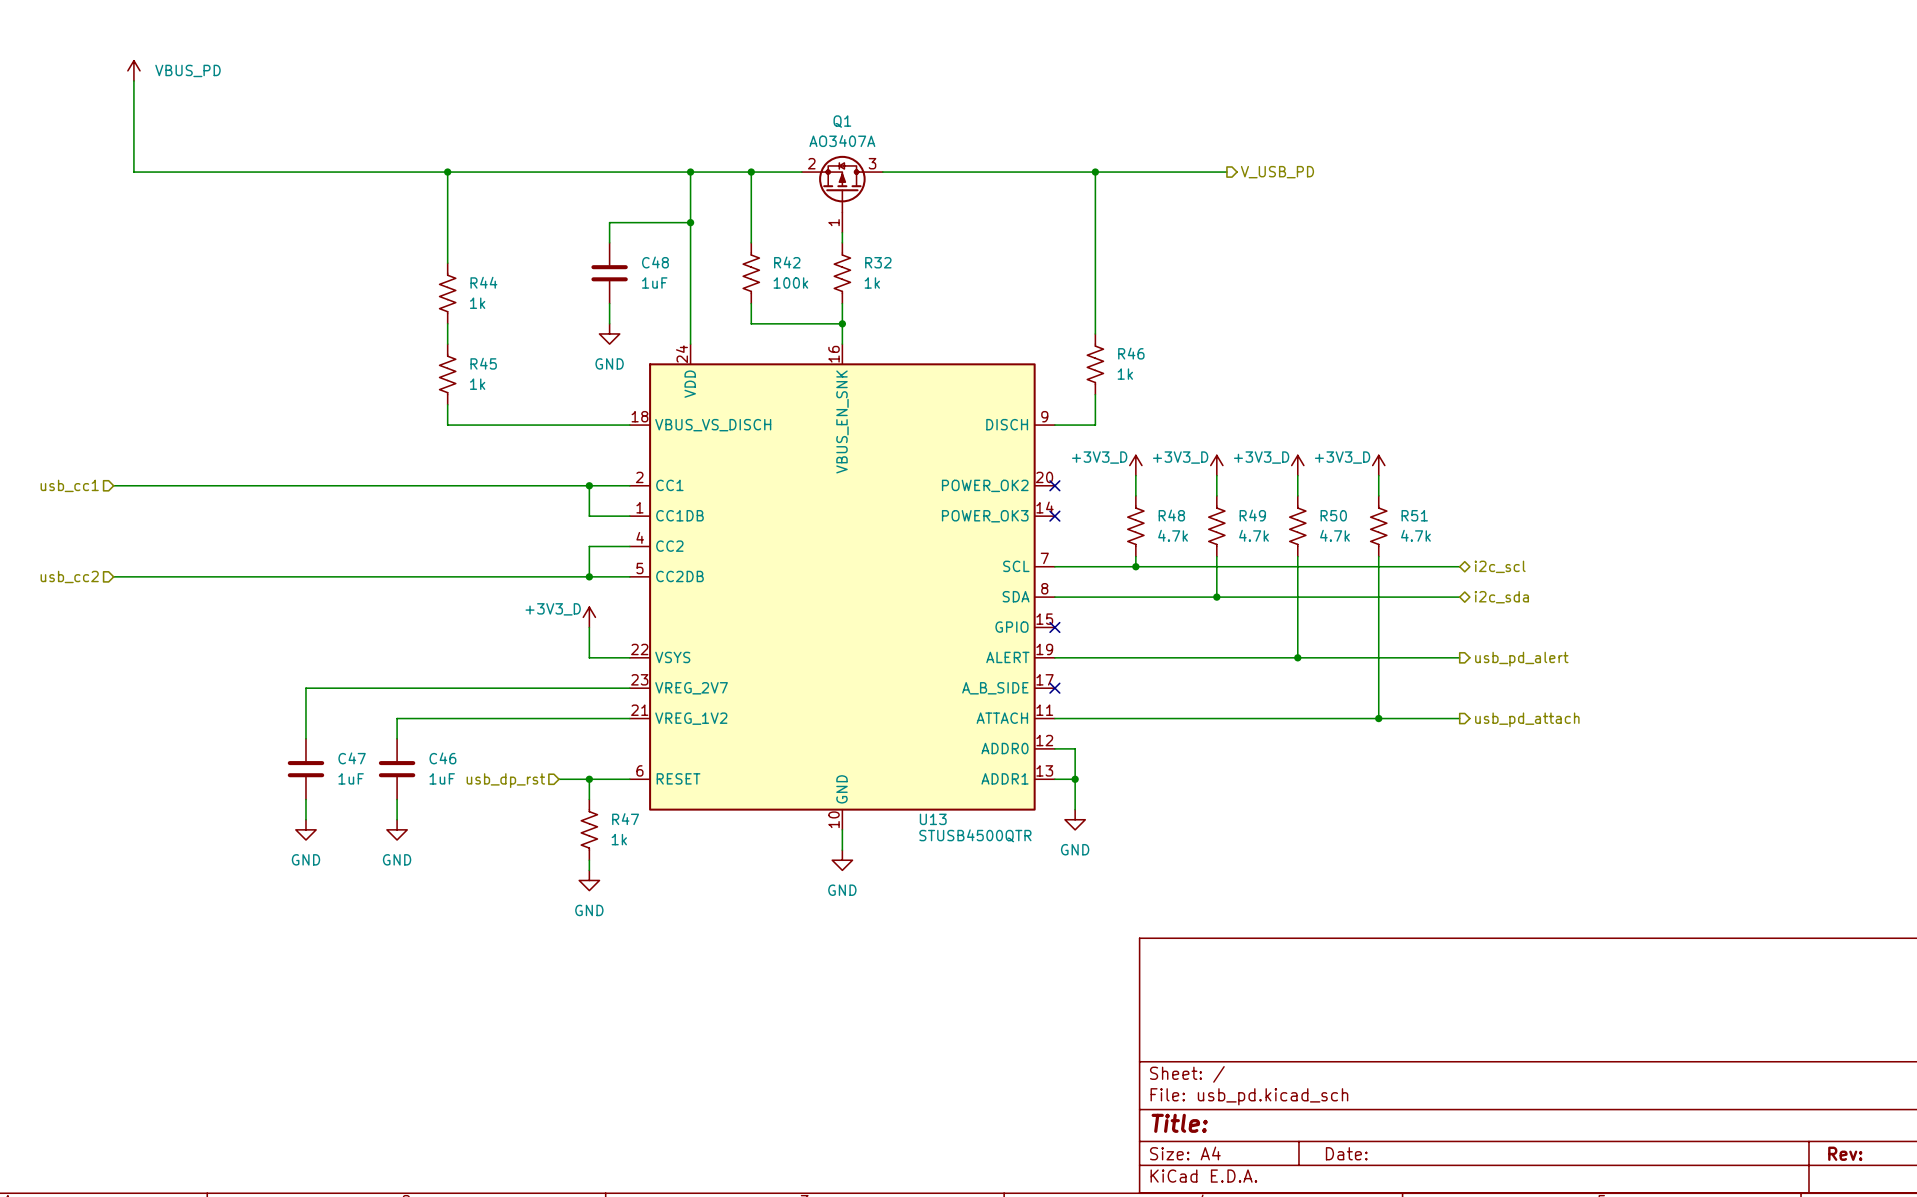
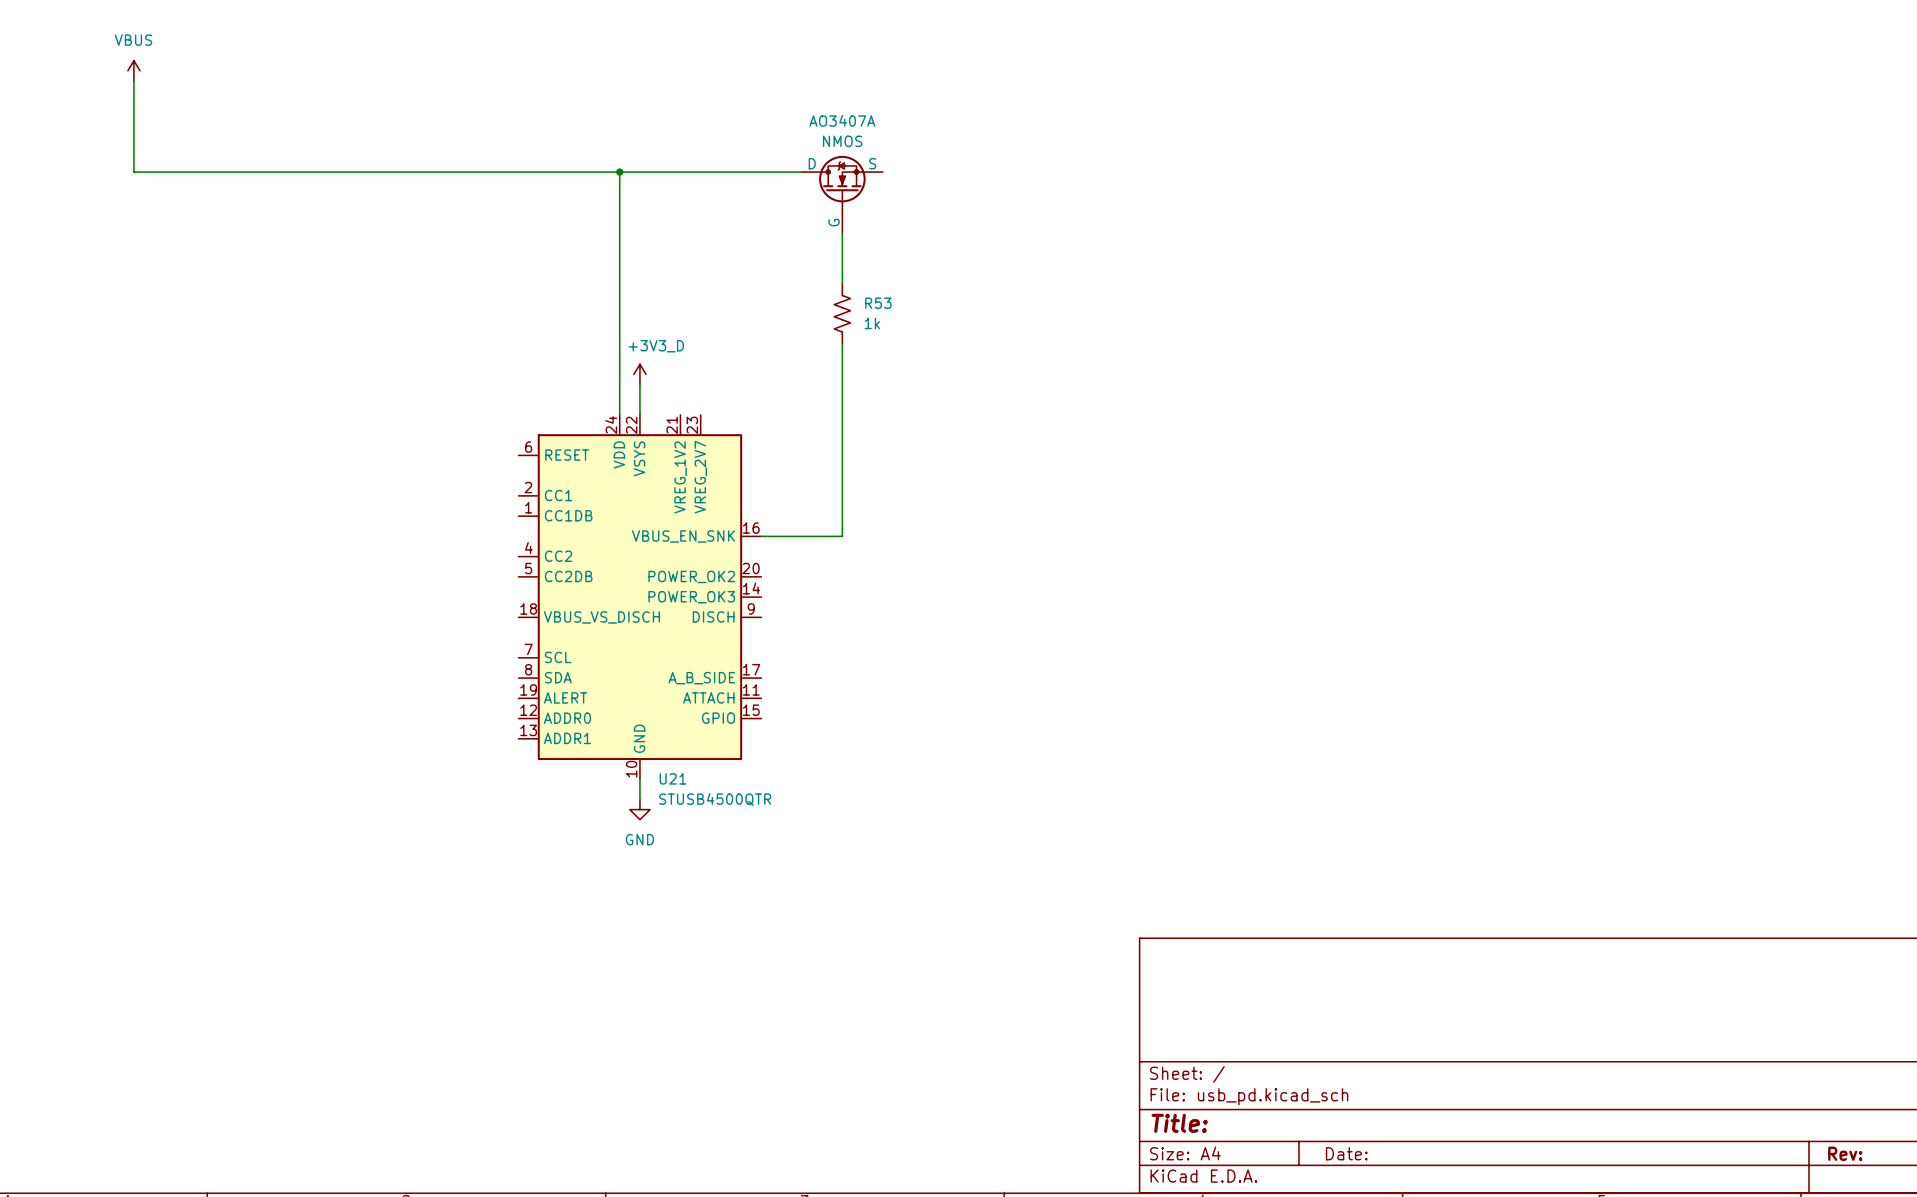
power symbol: VBUS_PD (133, 70) -> VBUS (133, 70)
wire: (447, 172) (447, 263) -> none
junction: (447, 172) -> none
wire: none -> (619, 172) (619, 414)
junction: none -> (619, 172)
wire: (690, 172) (690, 344) -> none
junction: (690, 172) -> none
wire: (751, 172) (751, 242) -> none
junction: (751, 172) -> none
wire: (882, 172) (1226, 172) -> none
wire: (1095, 172) (1095, 333) -> none
junction: (1095, 172) -> none
hierarchical label: V_USB_PD (1277, 172) -> none
Q1: AO3407A (842, 194) -> none
AO3407A: none -> NMOS (842, 194)
wire: (690, 222) (609, 222) (609, 242) -> none
junction: (690, 222) -> none
wire: none -> (842, 242) (842, 283)
C48: 1uF (609, 273) -> none
R42: 100k (751, 273) -> none
R32: 1k (842, 273) -> none
R44: 1k (447, 293) -> none
wire: (609, 303) (609, 323) -> none
wire: (751, 303) (751, 323) (842, 323) -> none
R53: none -> 1k (842, 313)
wire: (447, 323) (447, 344) -> none
junction: (842, 323) -> none
power symbol: GND (609, 333) -> none
R46: 1k (1095, 364) -> none
R45: 1k (447, 374) -> none
power symbol: none -> +3V3_D (639, 374)
wire: none -> (639, 384) (639, 414)
wire: (1095, 394) (1095, 425) (1054, 425) -> none
wire: (447, 404) (447, 425) (629, 425) -> none
power symbol: +3V3_D (1135, 465) -> none
power symbol: +3V3_D (1216, 465) -> none
power symbol: +3V3_D (1297, 465) -> none
power symbol: +3V3_D (1378, 465) -> none
wire: (1135, 475) (1135, 495) -> none
wire: (1216, 475) (1216, 495) -> none
wire: (1297, 475) (1297, 495) -> none
wire: (1378, 475) (1378, 495) -> none
hierarchical label: usb_cc1 (69, 485) -> none
wire: (113, 485) (629, 485) -> none
junction: (589, 485) -> none
no-connect mark: (1054, 485) -> none
no-connect mark: (1054, 516) -> none
R48: 4.7k (1135, 526) -> none
R49: 4.7k (1216, 526) -> none
R50: 4.7k (1297, 526) -> none
R51: 4.7k (1378, 526) -> none
wire: (1135, 556) (1135, 566) -> none
wire: (1216, 556) (1216, 597) -> none
wire: (1297, 556) (1297, 657) -> none
wire: (1378, 556) (1378, 718) -> none
wire: (1054, 566) (1459, 566) -> none
junction: (1135, 566) -> none
hierarchical label: i2c_scl (1500, 566) -> none
hierarchical label: usb_cc2 (69, 576) -> none
wire: (113, 576) (629, 576) -> none
junction: (589, 576) -> none
U13: STUSB4500QTR (842, 586) -> none
U21: none -> STUSB4500QTR (639, 597)
wire: (1054, 597) (1459, 597) -> none
junction: (1216, 597) -> none
hierarchical label: i2c_sda (1501, 597) -> none
power symbol: +3V3_D (589, 617) -> none
no-connect mark: (1054, 627) -> none
wire: (1054, 657) (1459, 657) -> none
junction: (1297, 657) -> none
hierarchical label: usb_pd_alert (1521, 659) -> none
wire: (629, 688) (305, 688) (305, 738) -> none
no-connect mark: (1054, 688) -> none
wire: (629, 718) (397, 718) (397, 738) -> none
wire: (1054, 718) (1459, 718) -> none
junction: (1378, 718) -> none
hierarchical label: usb_pd_attach (1527, 719) -> none
wire: (1054, 748) (1075, 748) (1075, 809) -> none
C47: 1uF (305, 769) -> none
C46: 1uF (397, 769) -> none
wire: (558, 779) (629, 779) -> none
wire: (589, 779) (589, 799) -> (639, 779) (639, 799)
junction: (589, 779) -> none
wire: (1054, 779) (1075, 779) -> none
junction: (1075, 779) -> none
hierarchical label: usb_dp_rst (505, 780) -> none
wire: (305, 799) (305, 819) -> none
wire: (397, 799) (397, 819) -> none
power symbol: GND (1075, 819) -> none
power symbol: GND (305, 829) -> none
power symbol: GND (397, 829) -> none
R47: 1k (589, 829) -> none
wire: (842, 829) (842, 850) -> none
wire: (589, 860) (589, 870) -> none
power symbol: GND (842, 860) -> none
power symbol position: GND (589, 880) -> GND (639, 809)

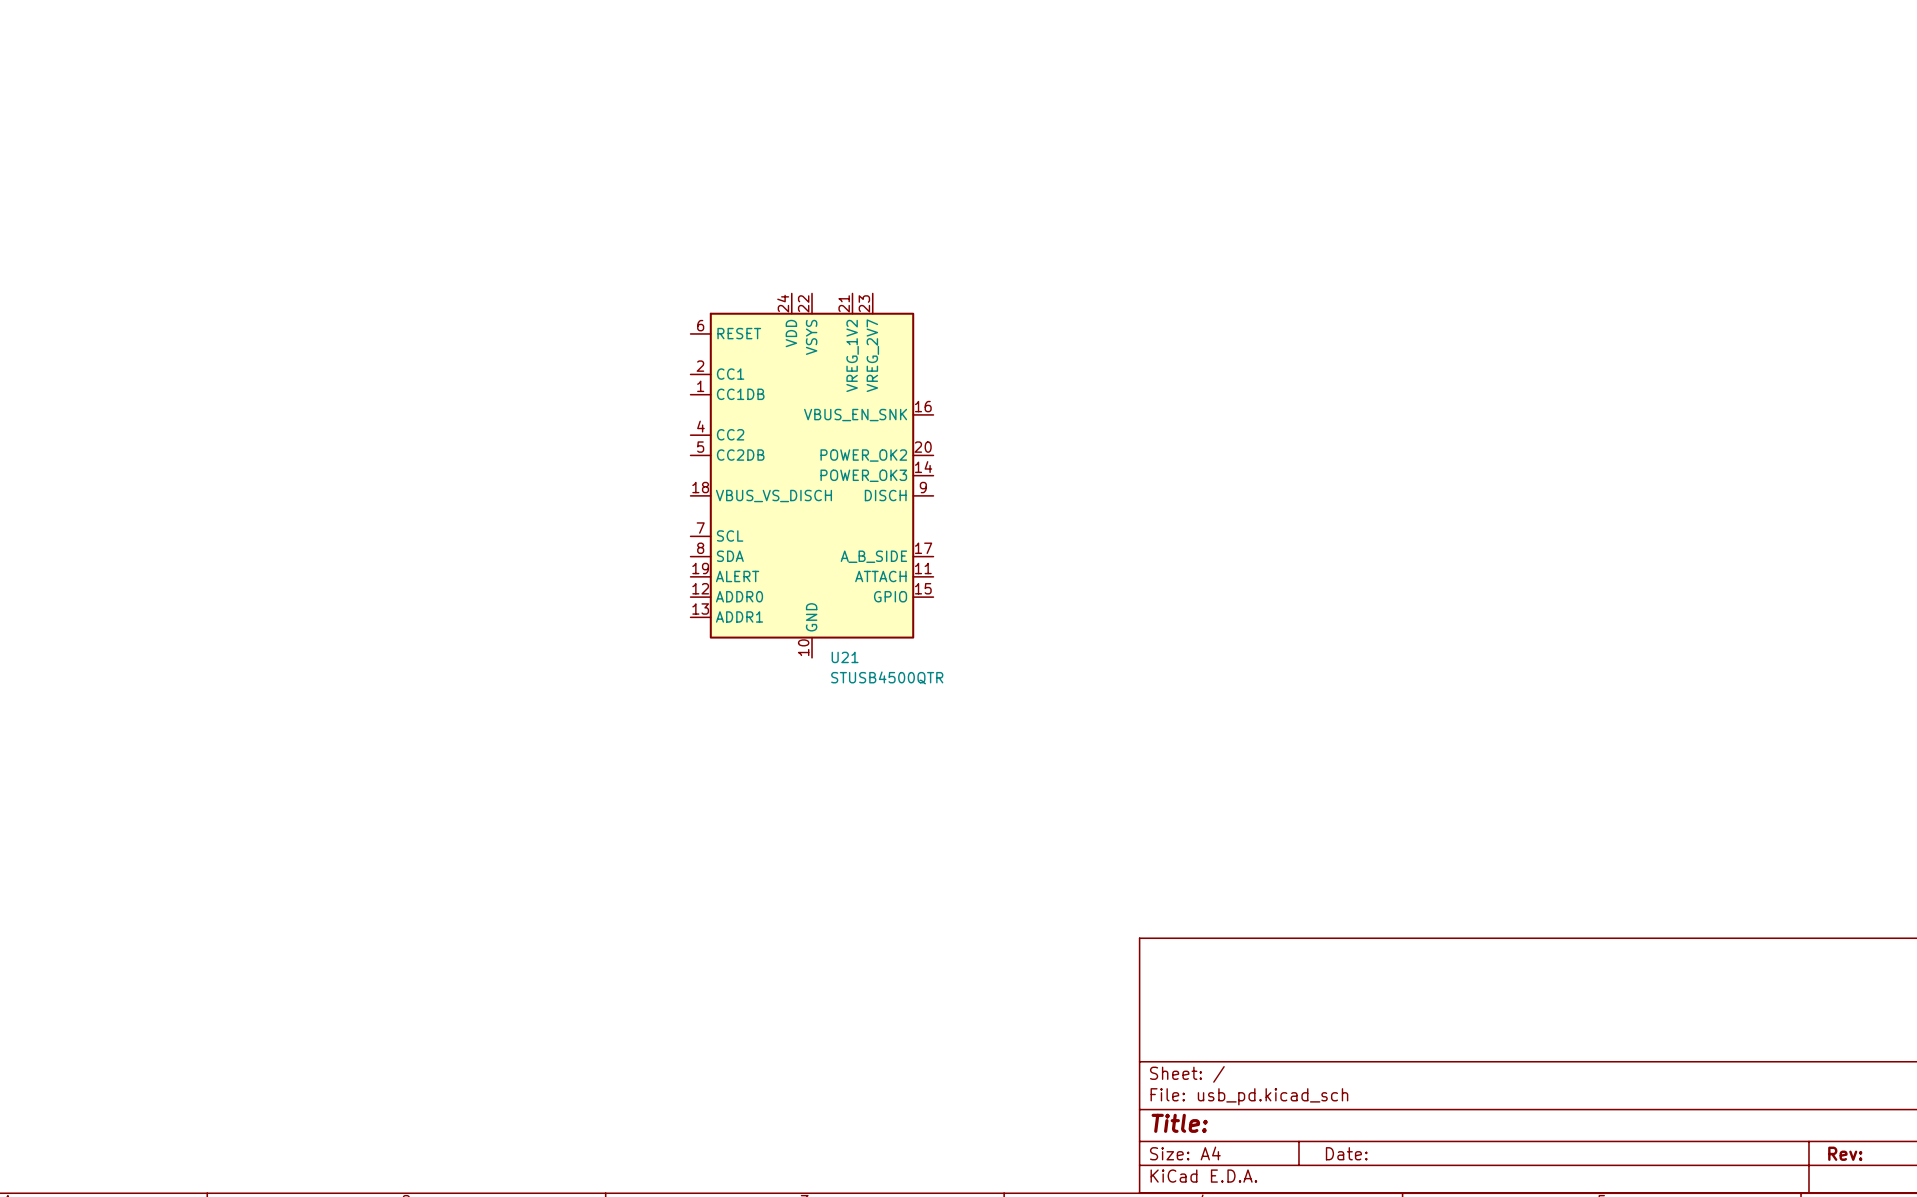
power symbol: VBUS (133, 70) -> none
wire: (133, 80) (133, 172) (801, 172) -> none
wire: (619, 172) (619, 414) -> none
junction: (619, 172) -> none
AO3407A: NMOS (842, 194) -> none
wire: (842, 232) (842, 283) -> none
R53: 1k (842, 313) -> none
power symbol: +3V3_D (639, 374) -> none
wire: (639, 384) (639, 414) -> none
U21 position: (639, 597) -> (812, 475)
wire: (639, 779) (639, 799) -> none
power symbol: GND (639, 809) -> none

